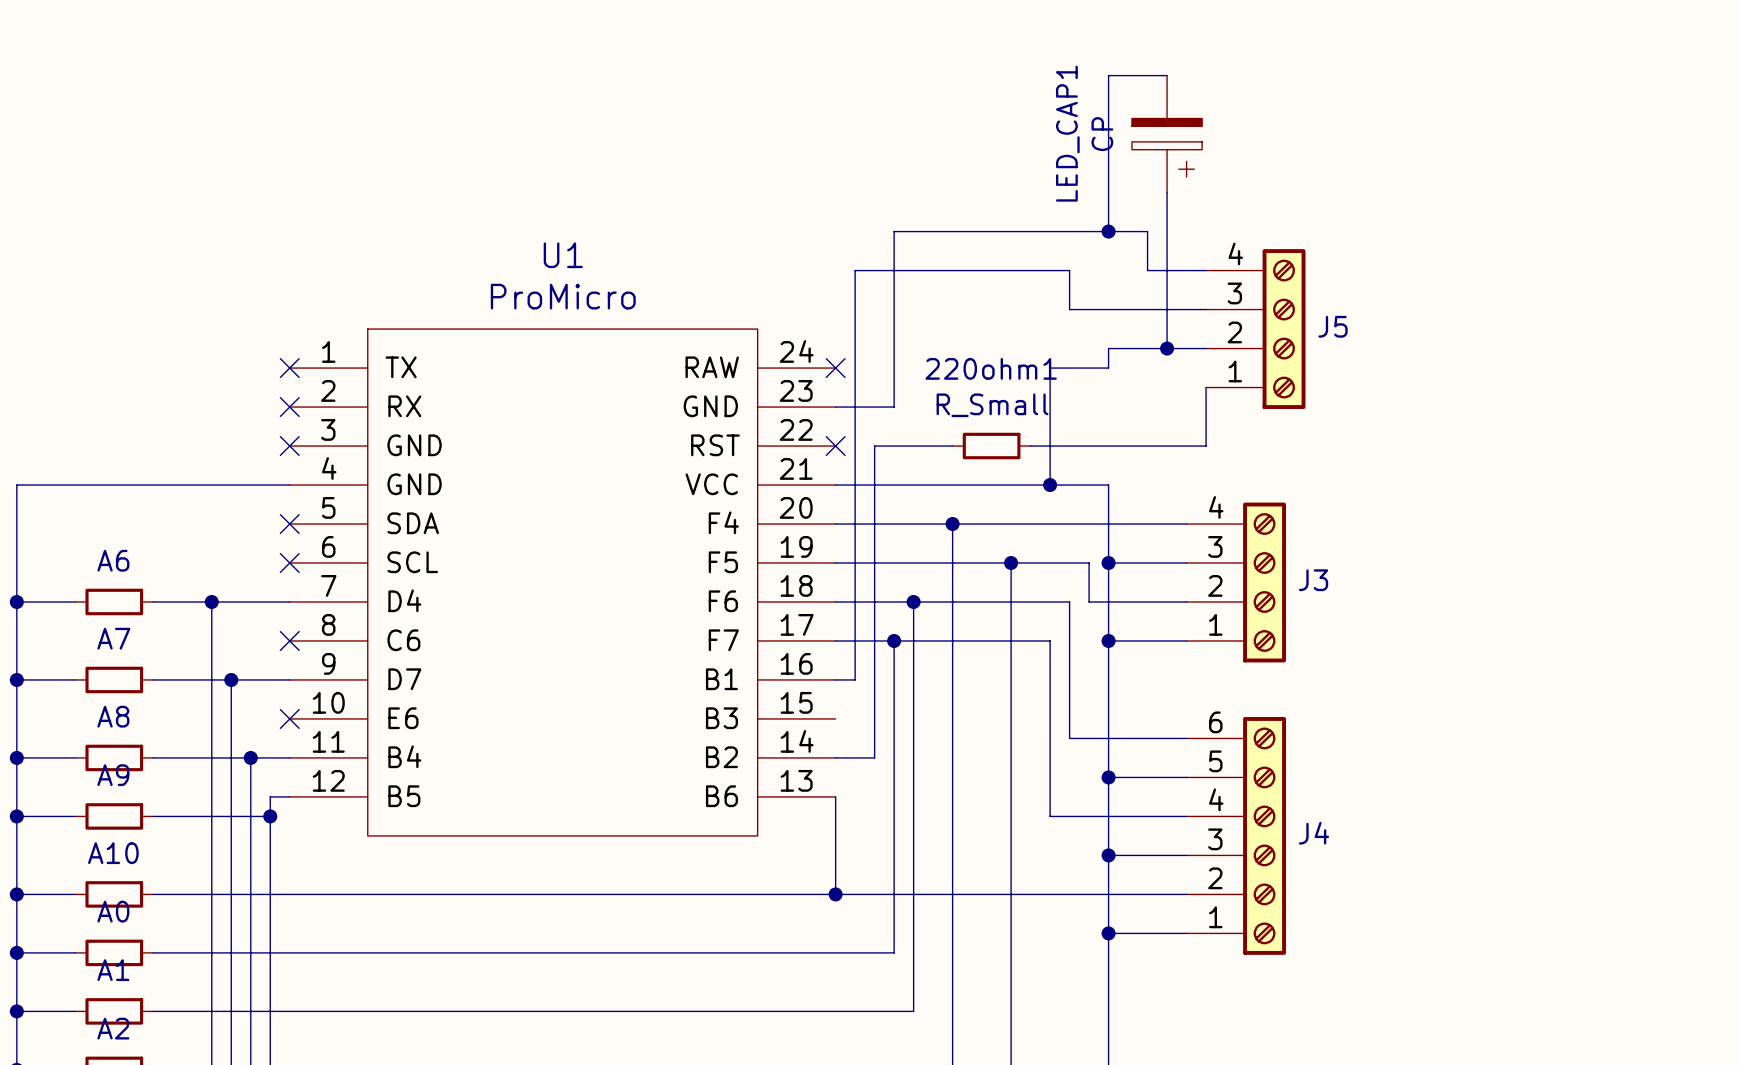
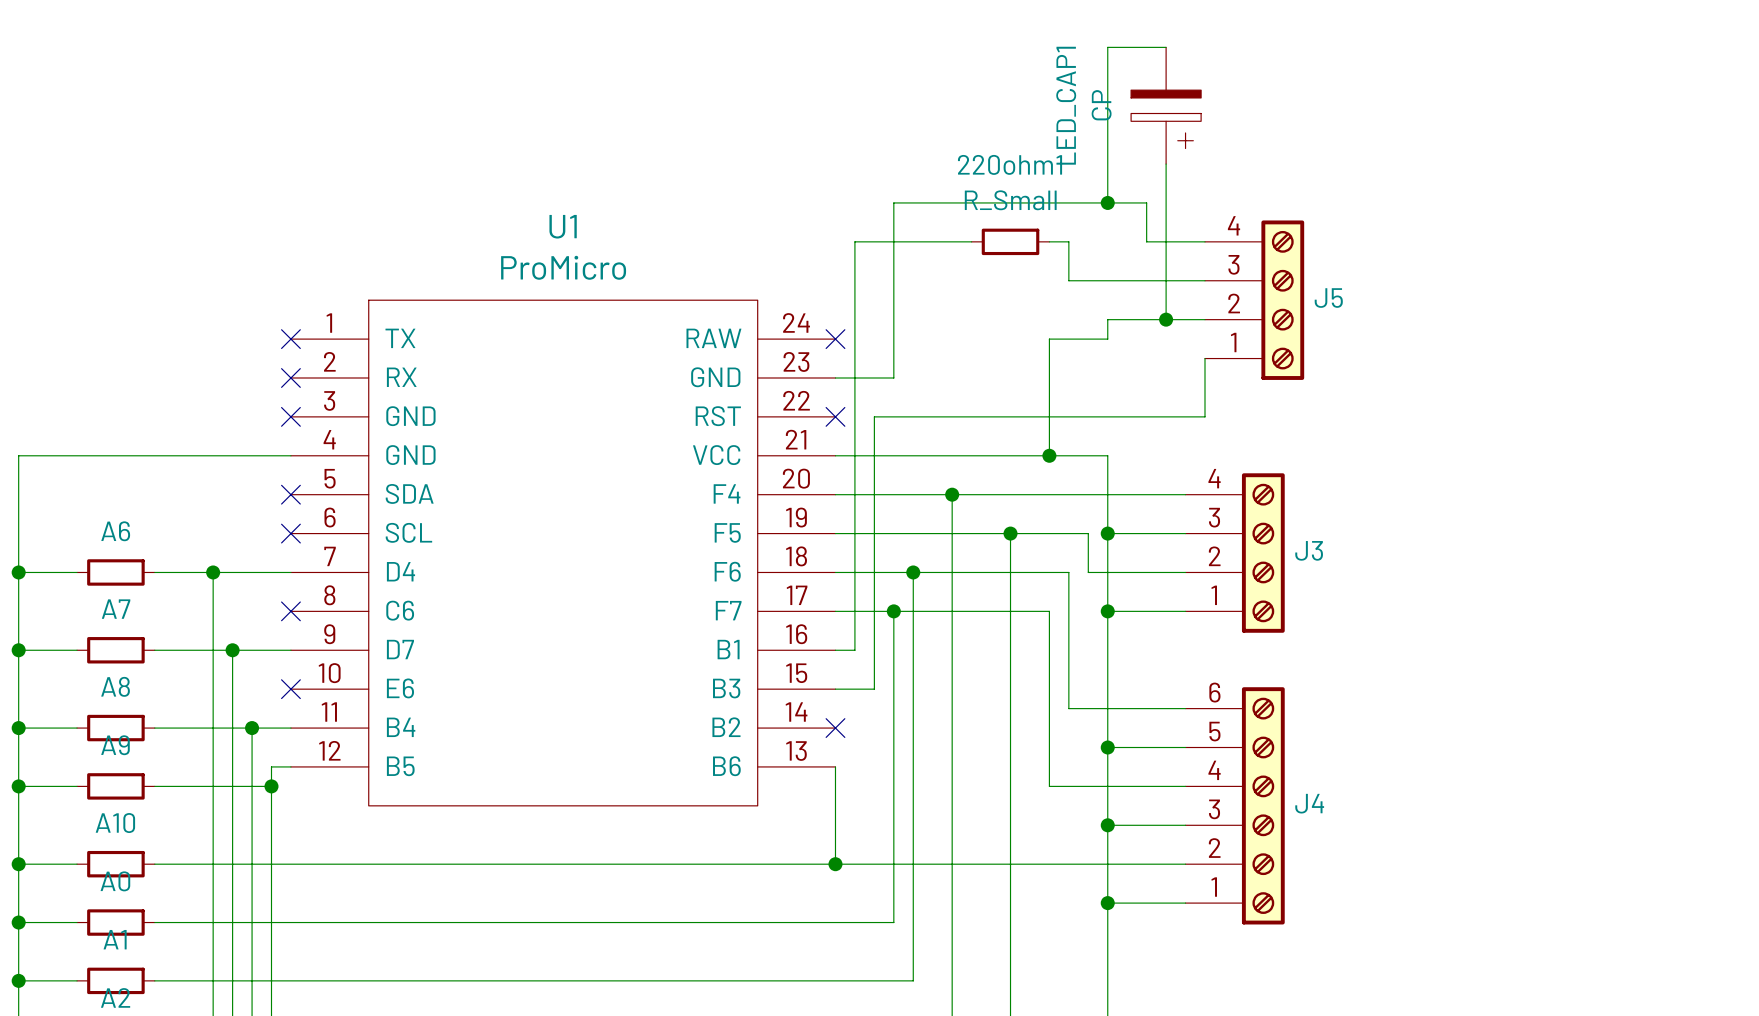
wire: (972, 270) (1050, 270) -> (952, 416) (1029, 416)
220ohm1 position: (991, 446) -> (1010, 241)
wire: (874, 718) (874, 757) (835, 757) -> (874, 689) (835, 689)
no-connect mark: none -> (835, 728)

